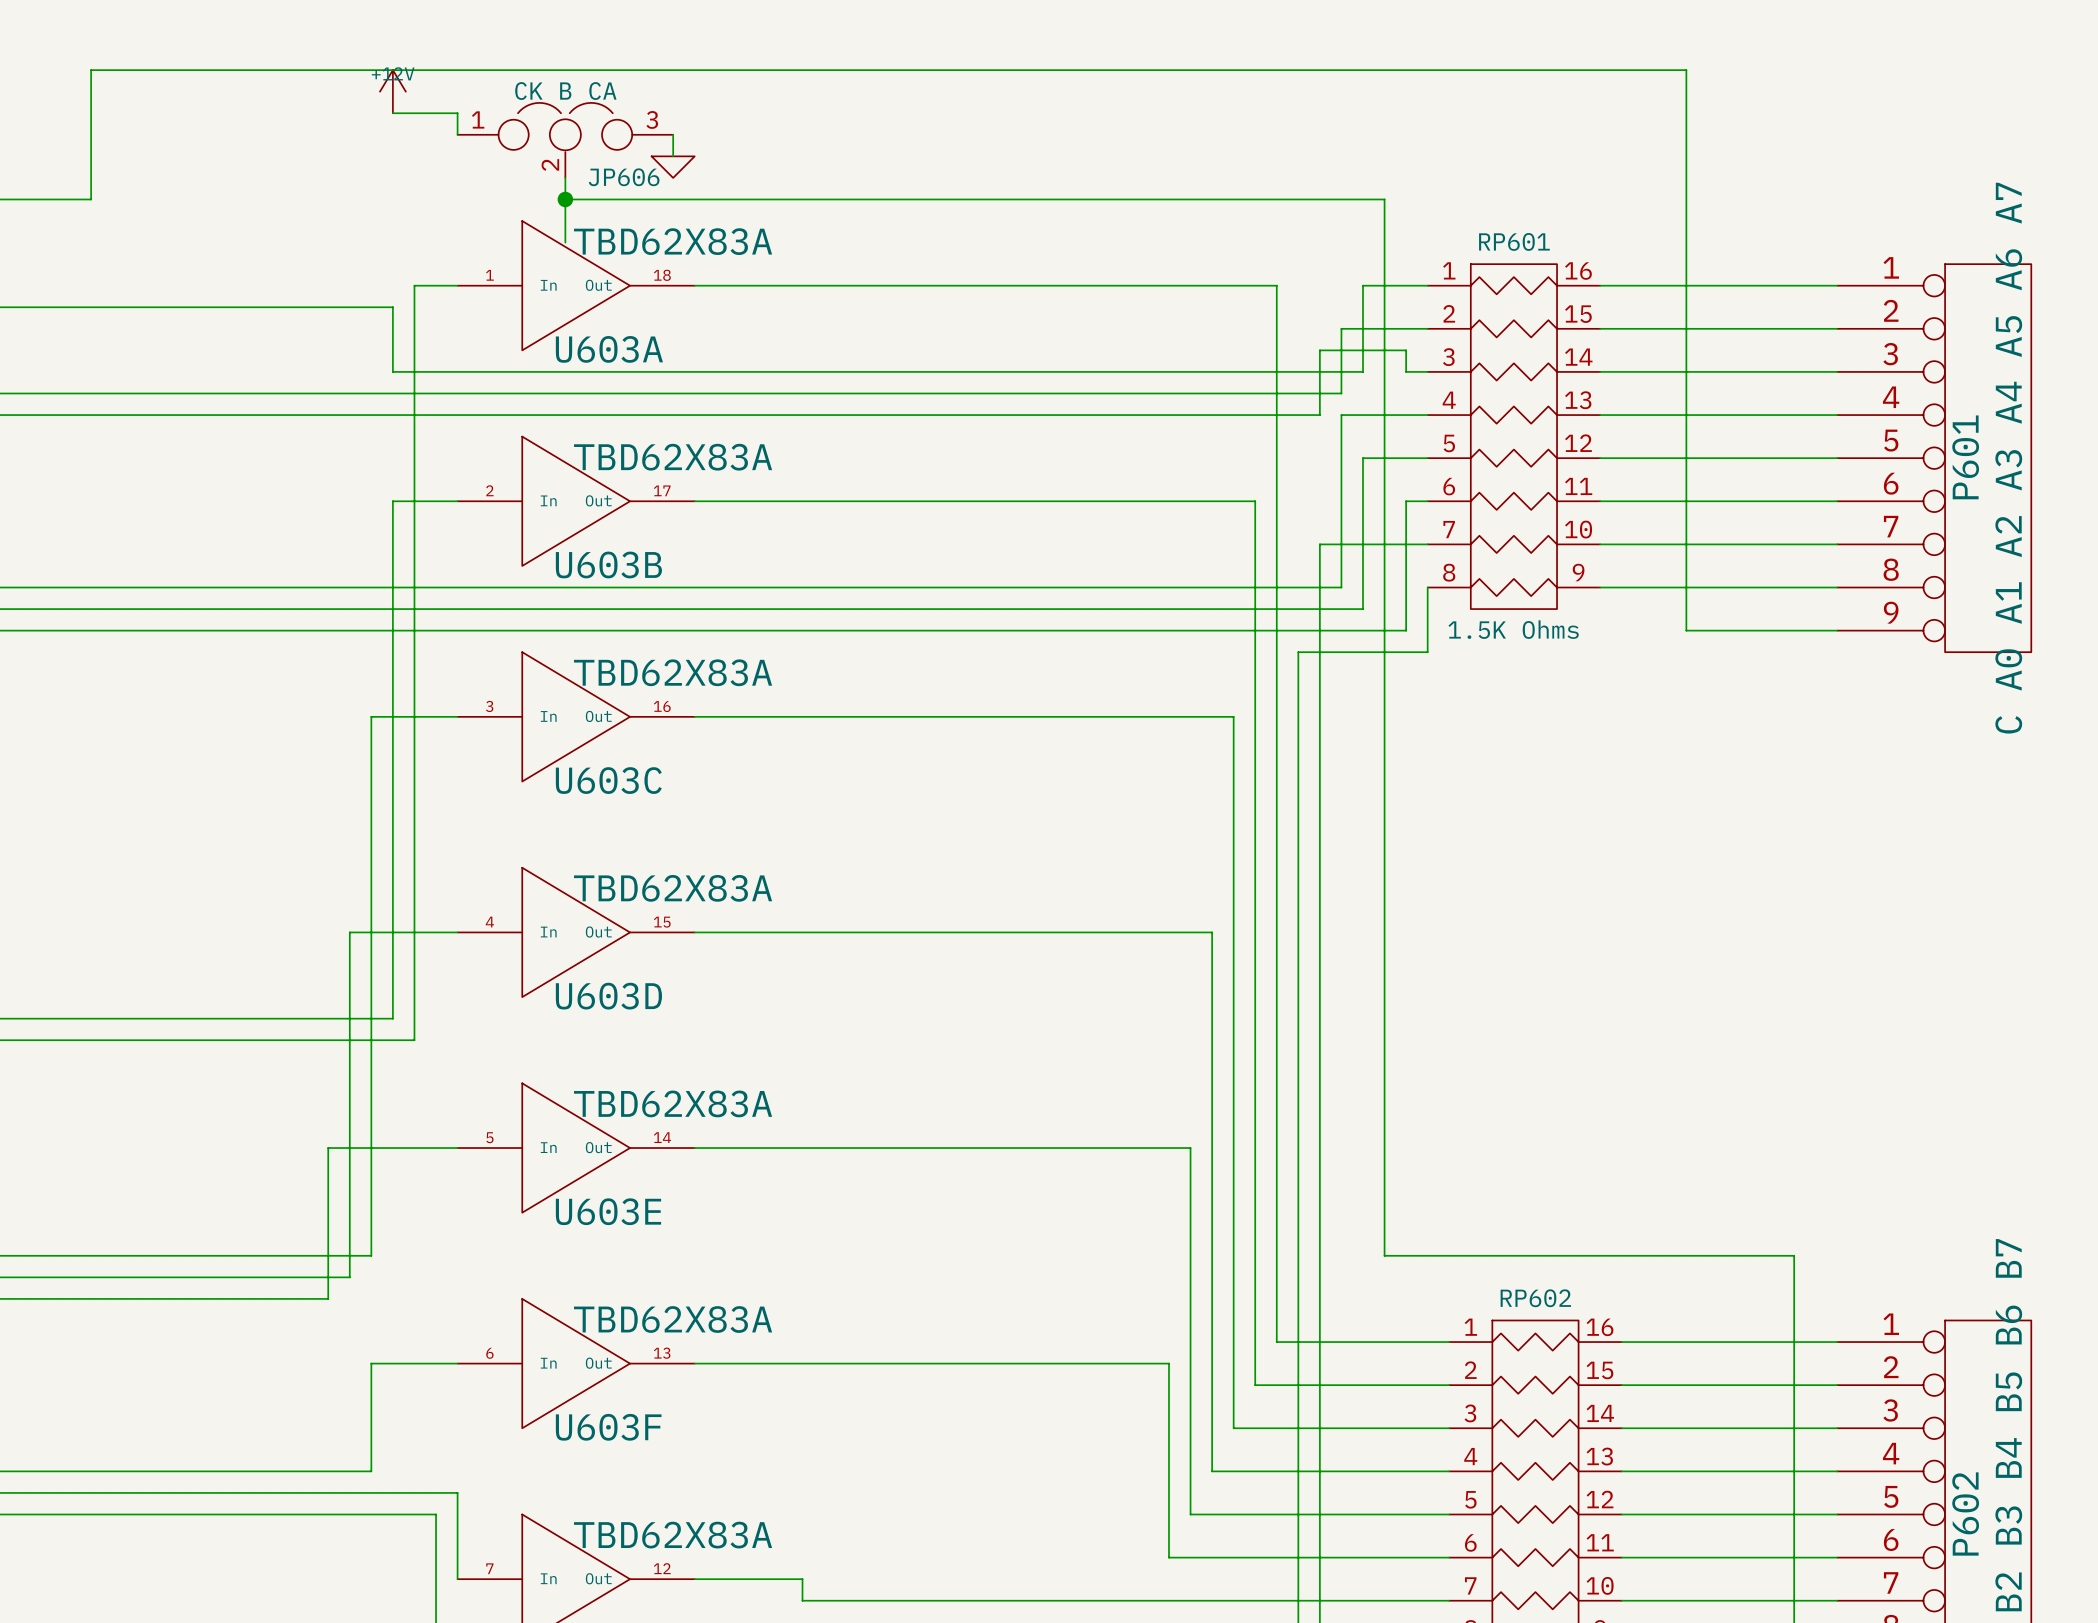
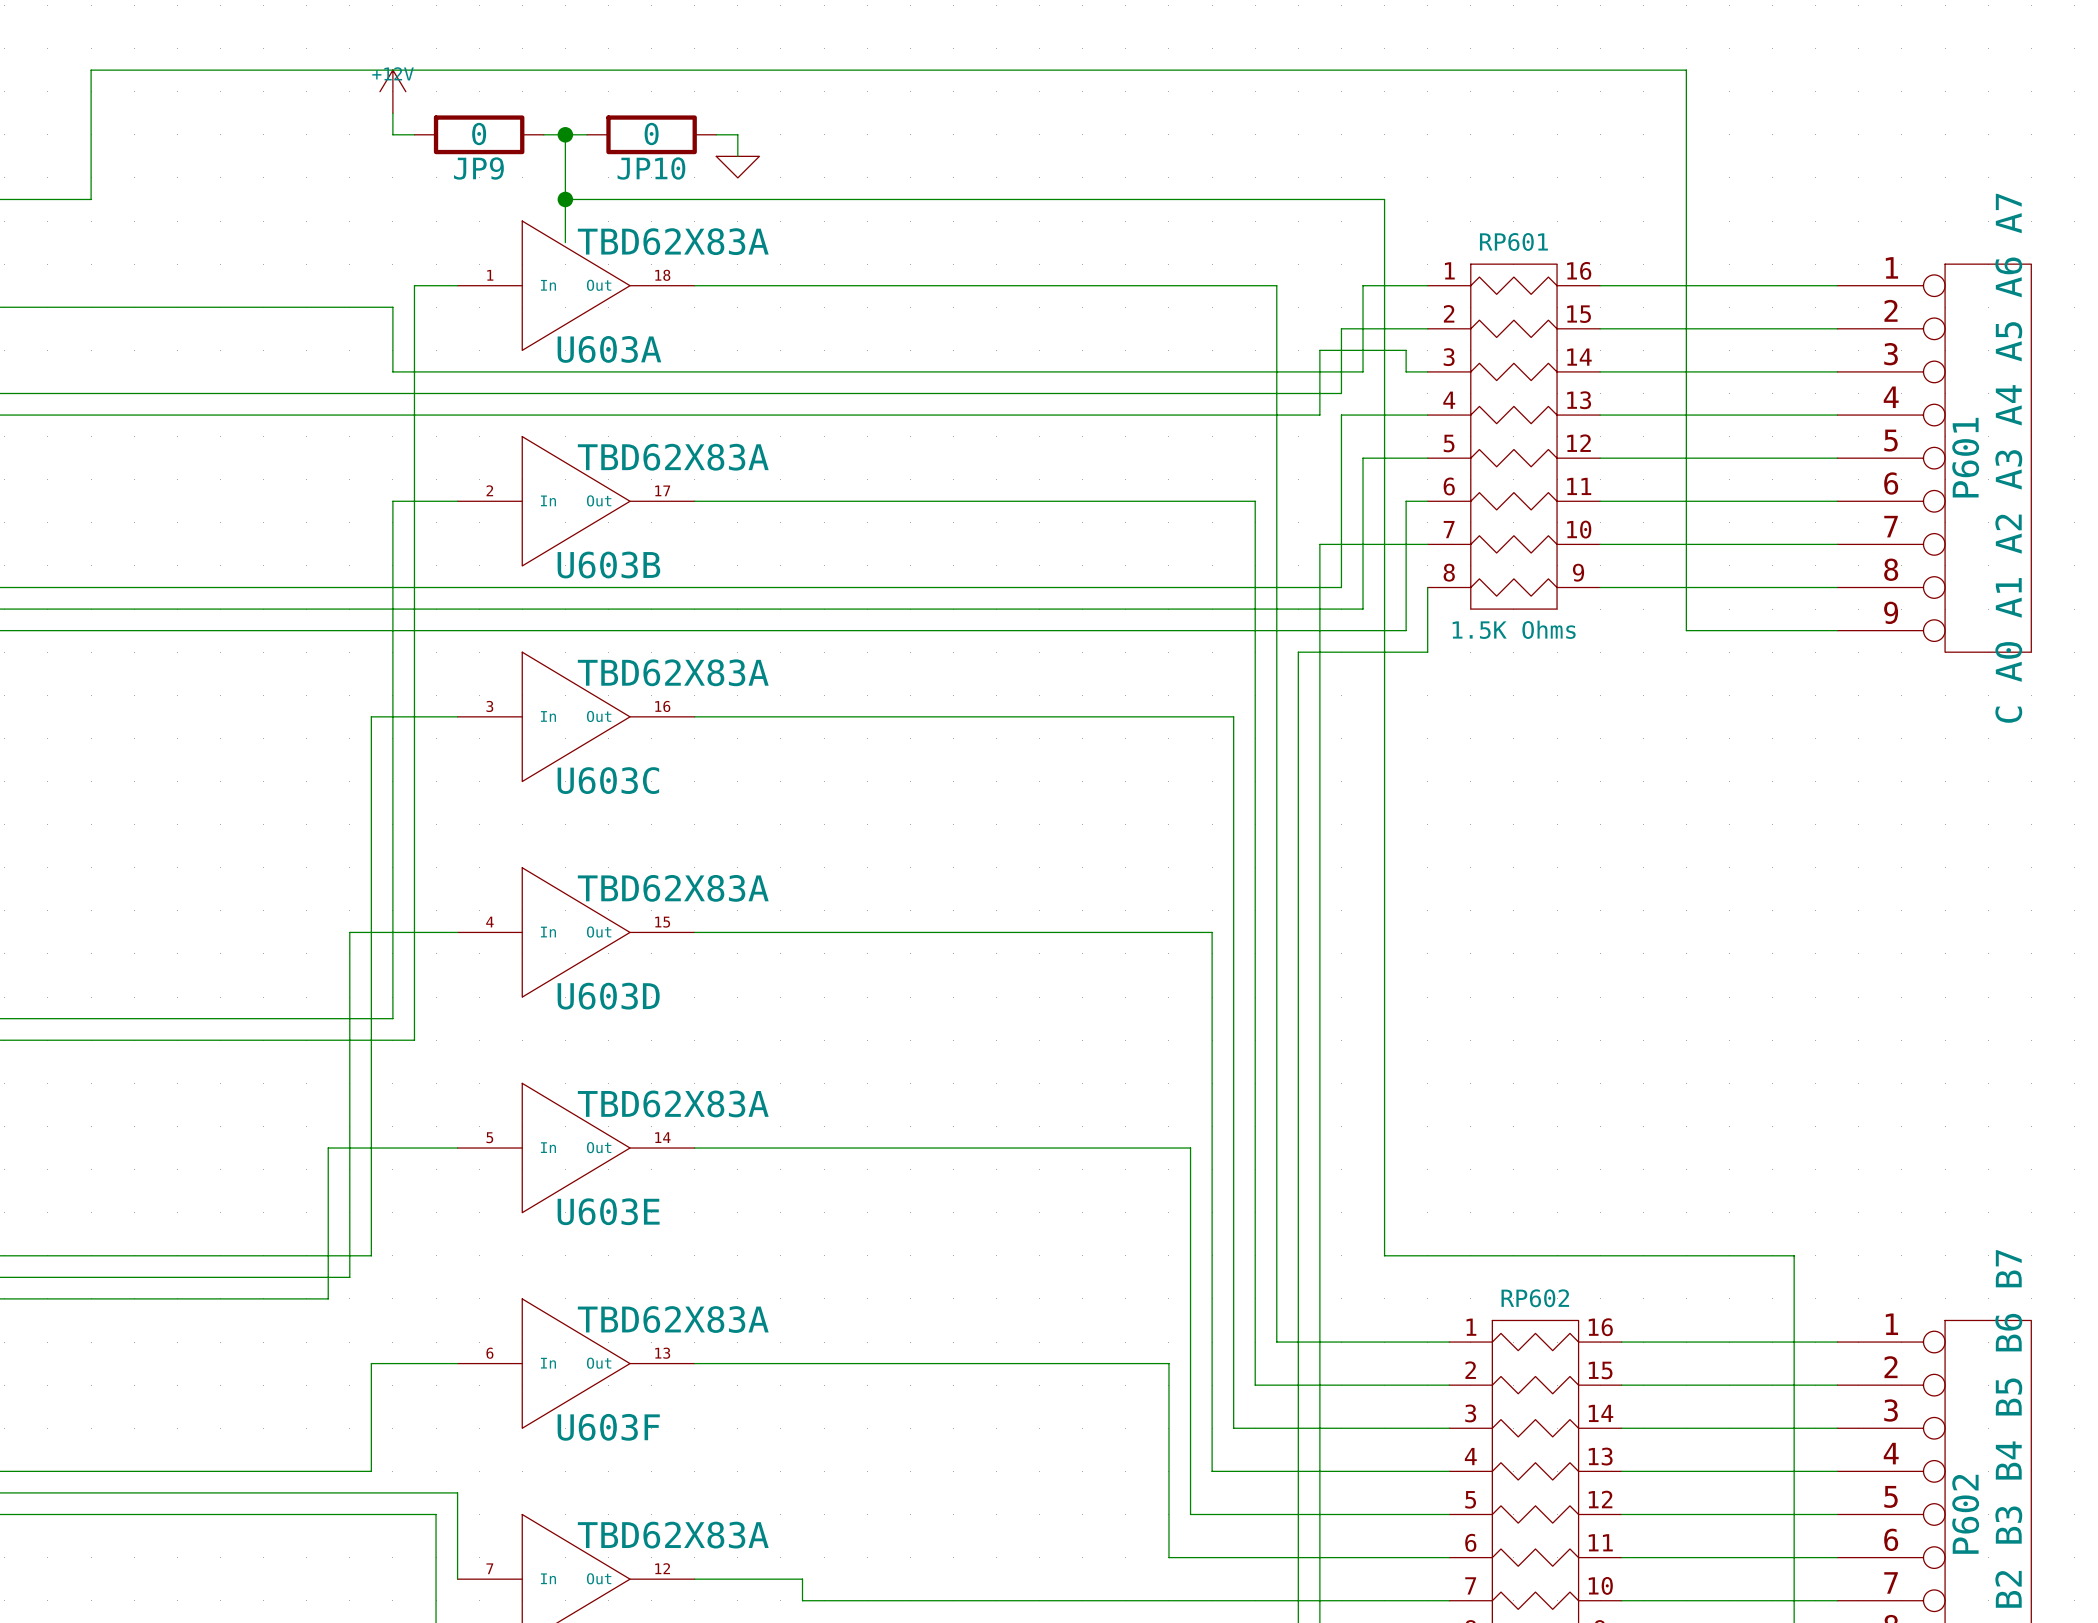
wire: (392, 113) (457, 113) (457, 134) -> (392, 113) (392, 134) (414, 134)
JP9: none -> 0 (479, 134)
wire: none -> (543, 134) (586, 134)
junction: none -> (565, 134)
JP10: none -> 0 (651, 134)
wire: (673, 134) (673, 156) -> none
wire: none -> (716, 134) (737, 134) (737, 156)
JP606: CK B CA (565, 140) -> none
power symbol position: (673, 167) -> (737, 167)

